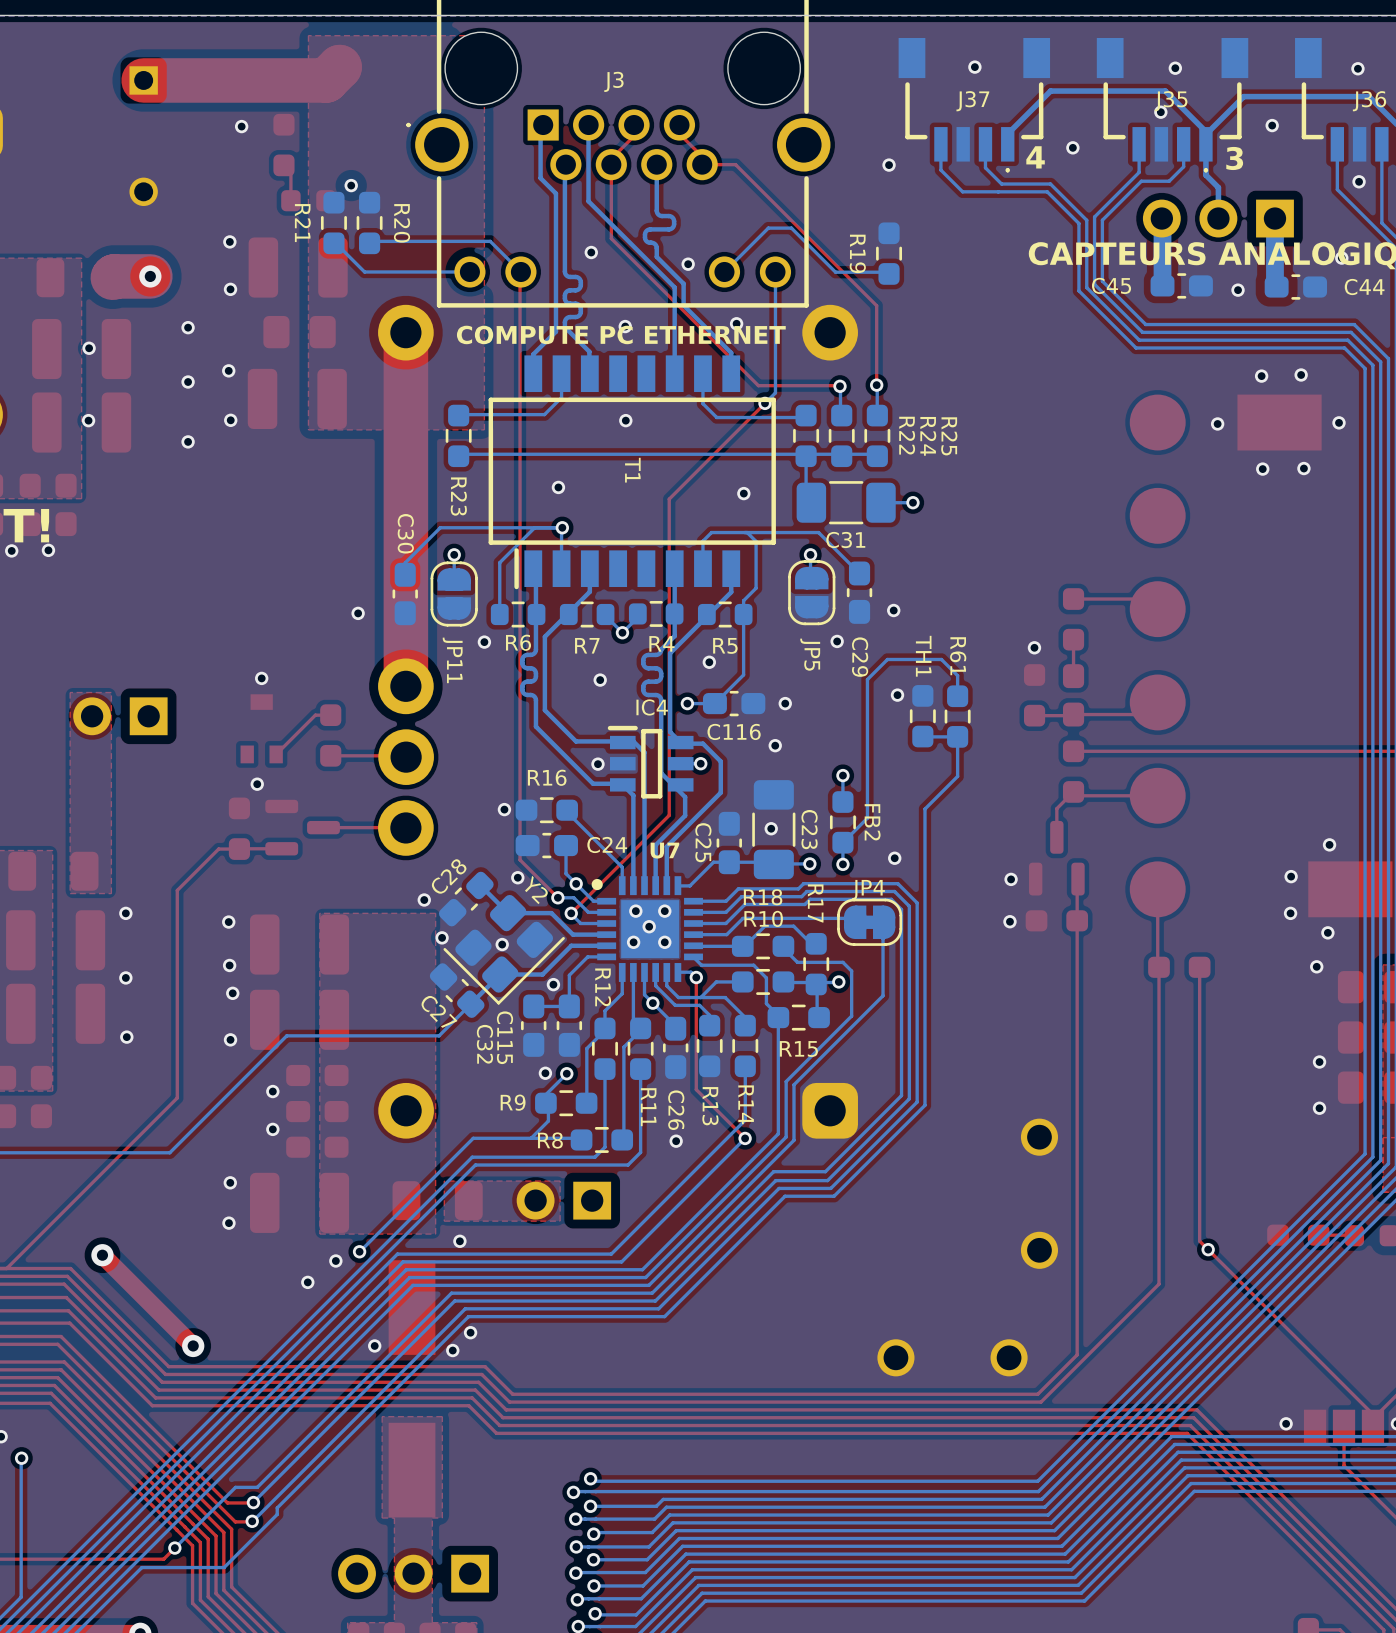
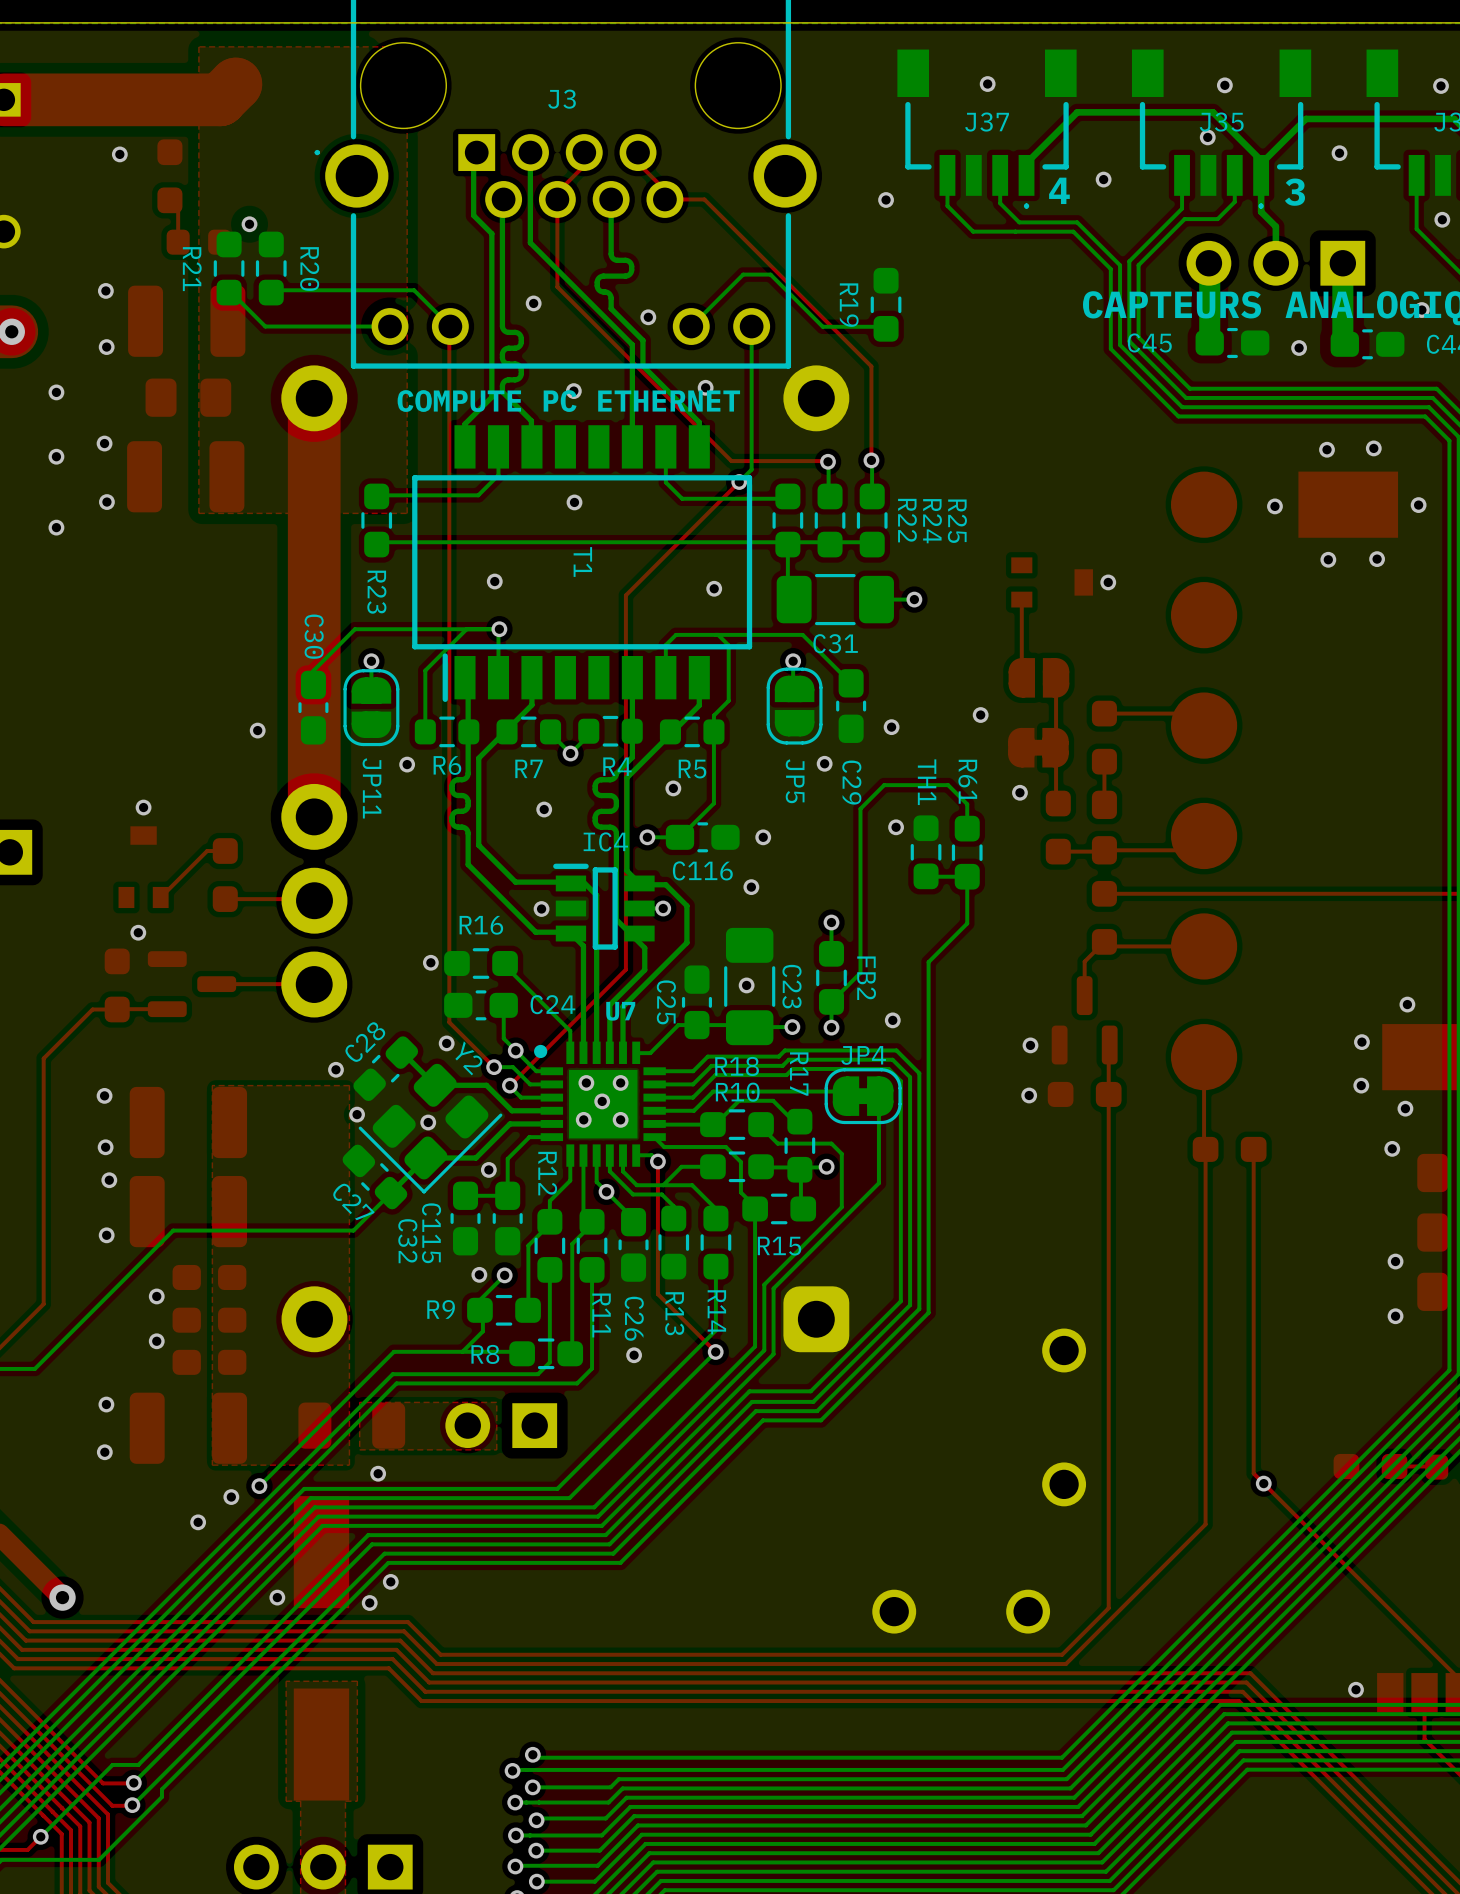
part: none -> (1052, 582)
via: none -> (1108, 582)
top track: none -> (1021, 599) (1021, 677)
part: none -> (1038, 677)
top track: none -> (1056, 677) (1056, 801) (1058, 803)
via: none -> (980, 715)
part: none -> (1038, 747)
via position: (1034, 647) -> (1019, 792)

